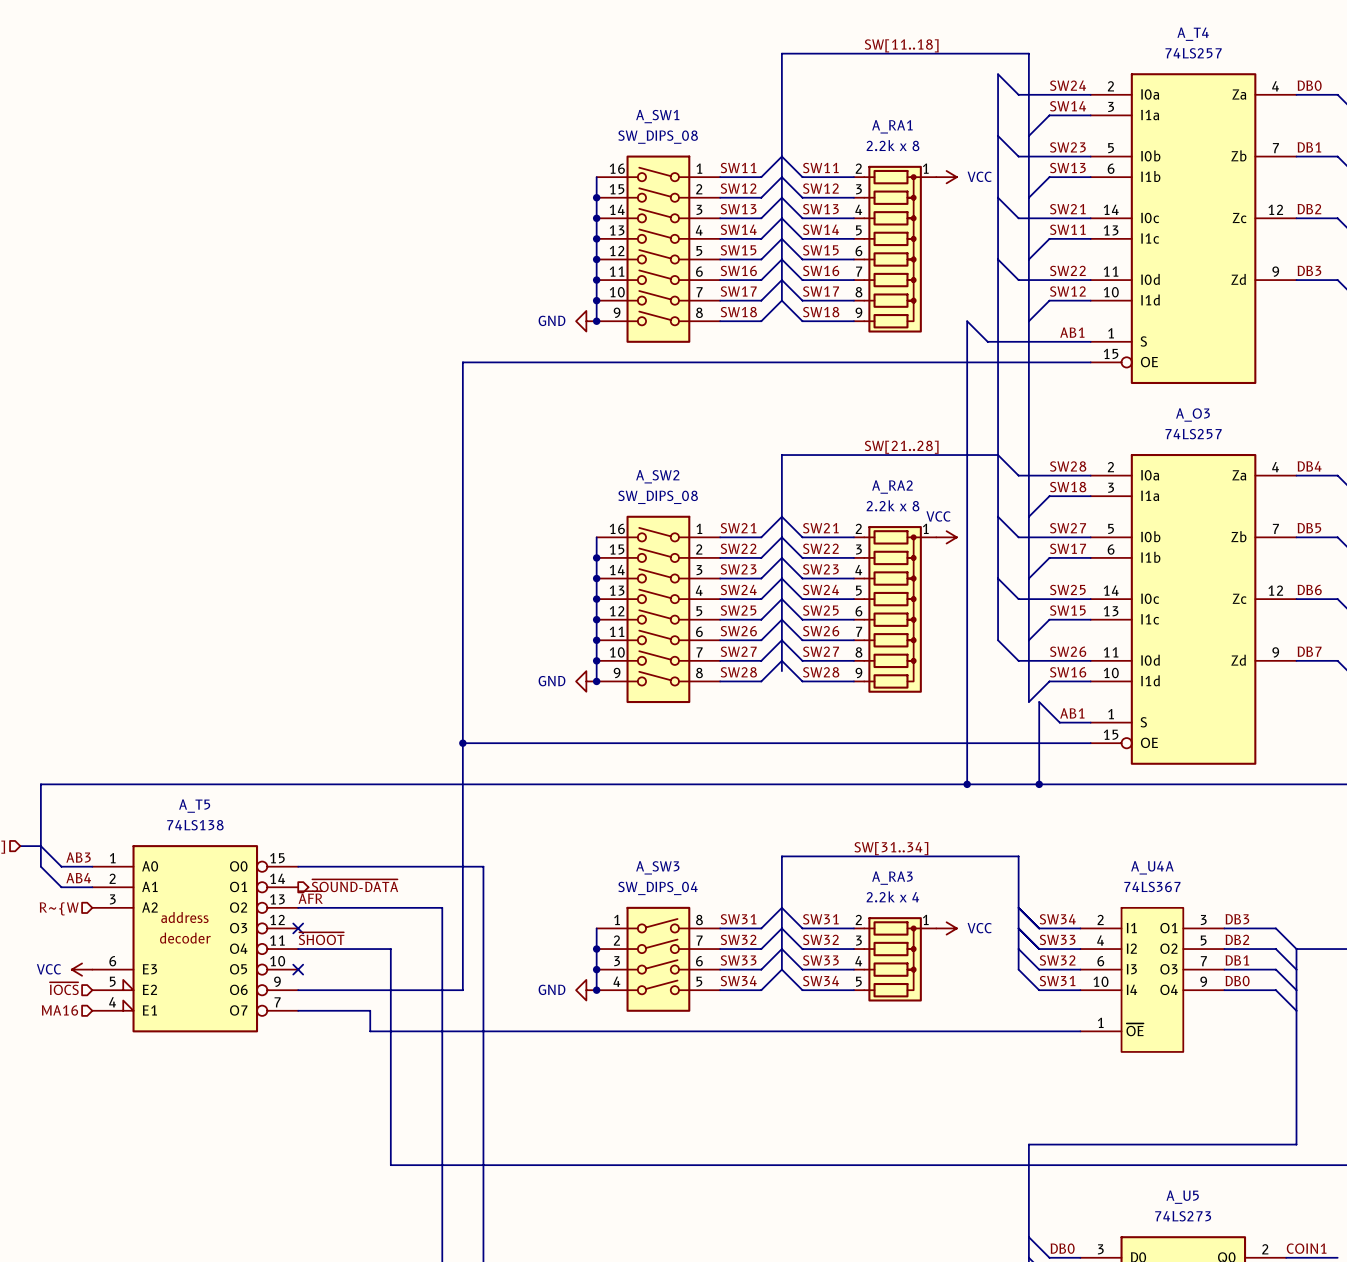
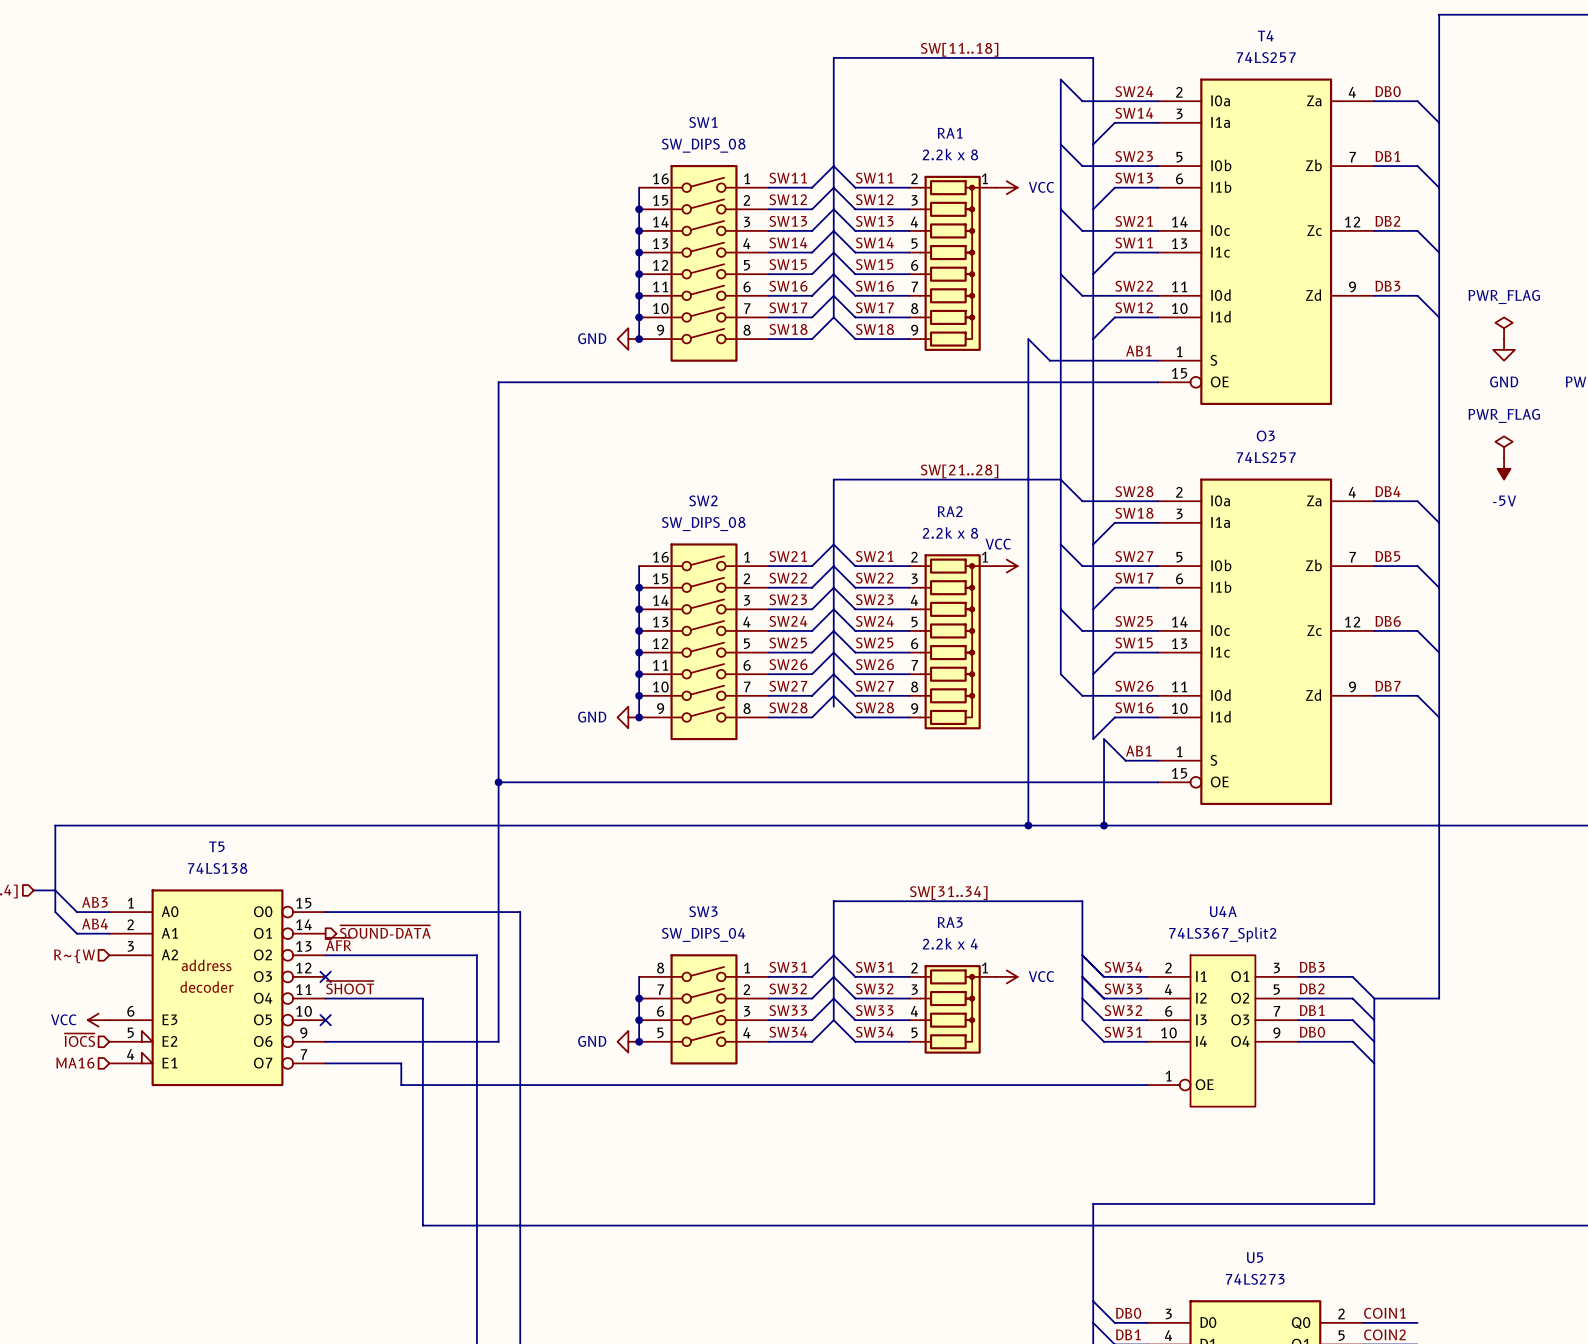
A_T4 name: A_T4 (1193, 34) -> T4 (1265, 35)
A_RA1 name: A_RA1 (892, 126) -> RA1 (950, 133)
A_SW1: SW_DIPS_08 (658, 249) -> none
SW1: none -> SW_DIPS_08 (704, 263)
A_O3 name: A_O3 (1192, 415) -> O3 (1265, 436)
A_RA2 name: A_RA2 (892, 487) -> RA2 (950, 511)
A_SW2: SW_DIPS_08 (658, 609) -> none
SW2: none -> SW_DIPS_08 (704, 641)
A_T5 name: A_T5 (194, 806) -> T5 (216, 846)
A_SW3 name: A_SW3 (657, 867) -> SW3 (703, 911)
A_RA3 name: A_RA3 (892, 878) -> RA3 (950, 922)
A_SW3 pin number: 1 (617, 919) -> 8 (660, 968)
A_SW3 pin number: 8 (699, 920) -> 1 (747, 968)
A_SW3 pin number: 2 (616, 940) -> 7 (660, 989)
A_SW3 pin number: 7 (699, 940) -> 2 (746, 989)
A_SW3 pin number: 3 (617, 961) -> 6 (660, 1011)
A_SW3 pin number: 6 (699, 961) -> 3 (747, 1011)
A_U4A: 74LS367 (1152, 979) -> none
U4A: none -> 74LS367_Split2 (1222, 1030)
A_SW3 pin number: 4 (616, 981) -> 5 (660, 1032)
A_SW3 pin number: 5 (699, 981) -> 4 (746, 1032)
A_U5 name: A_U5 (1182, 1197) -> U5 (1255, 1257)

